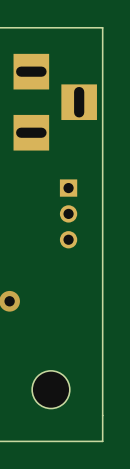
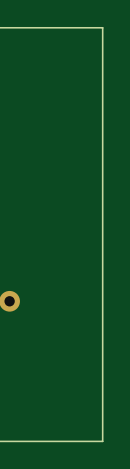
part: (55, 102) -> none
part: (68, 213) -> none
part: (50, 389) -> none

